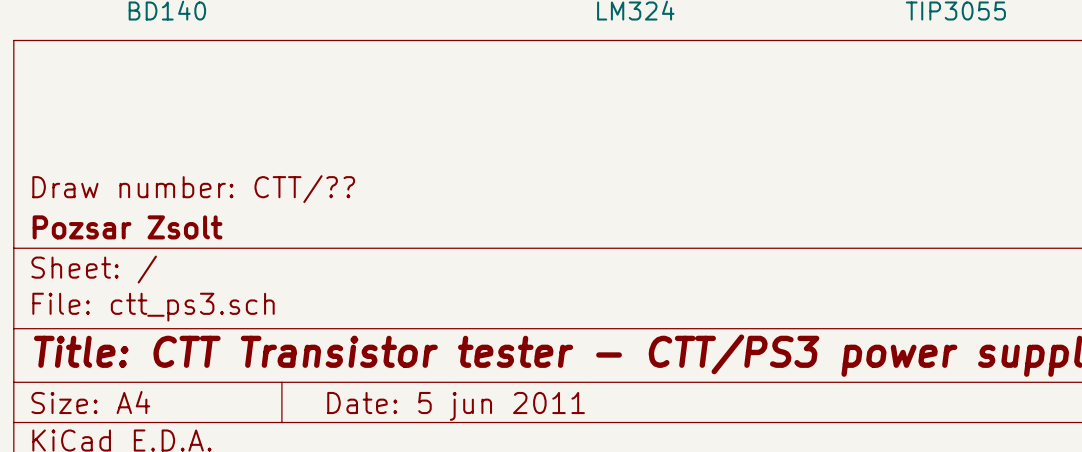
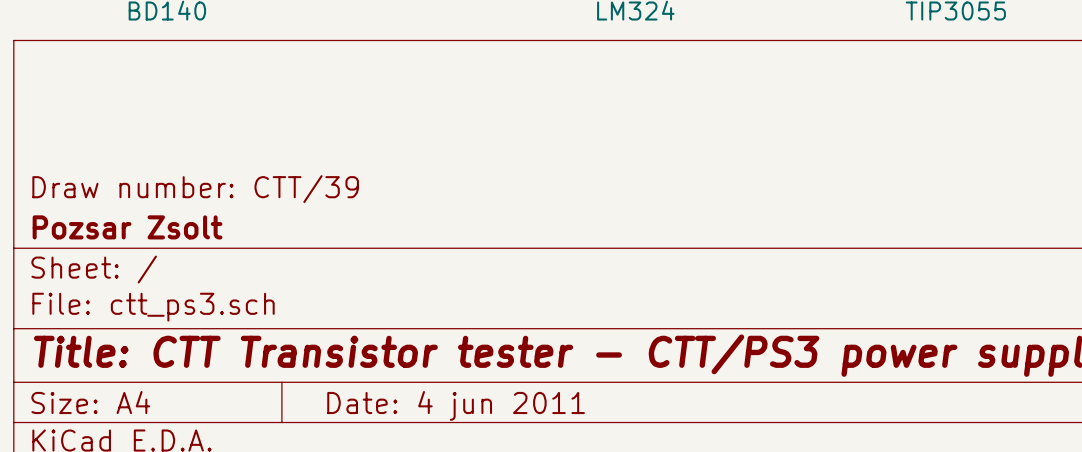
title block: Draw number: CTT/?? (193, 189) -> Draw number: CTT/39 (195, 189)
title block: Date: 5 jun 2011 (456, 406) -> Date: 4 jun 2011 (456, 405)

